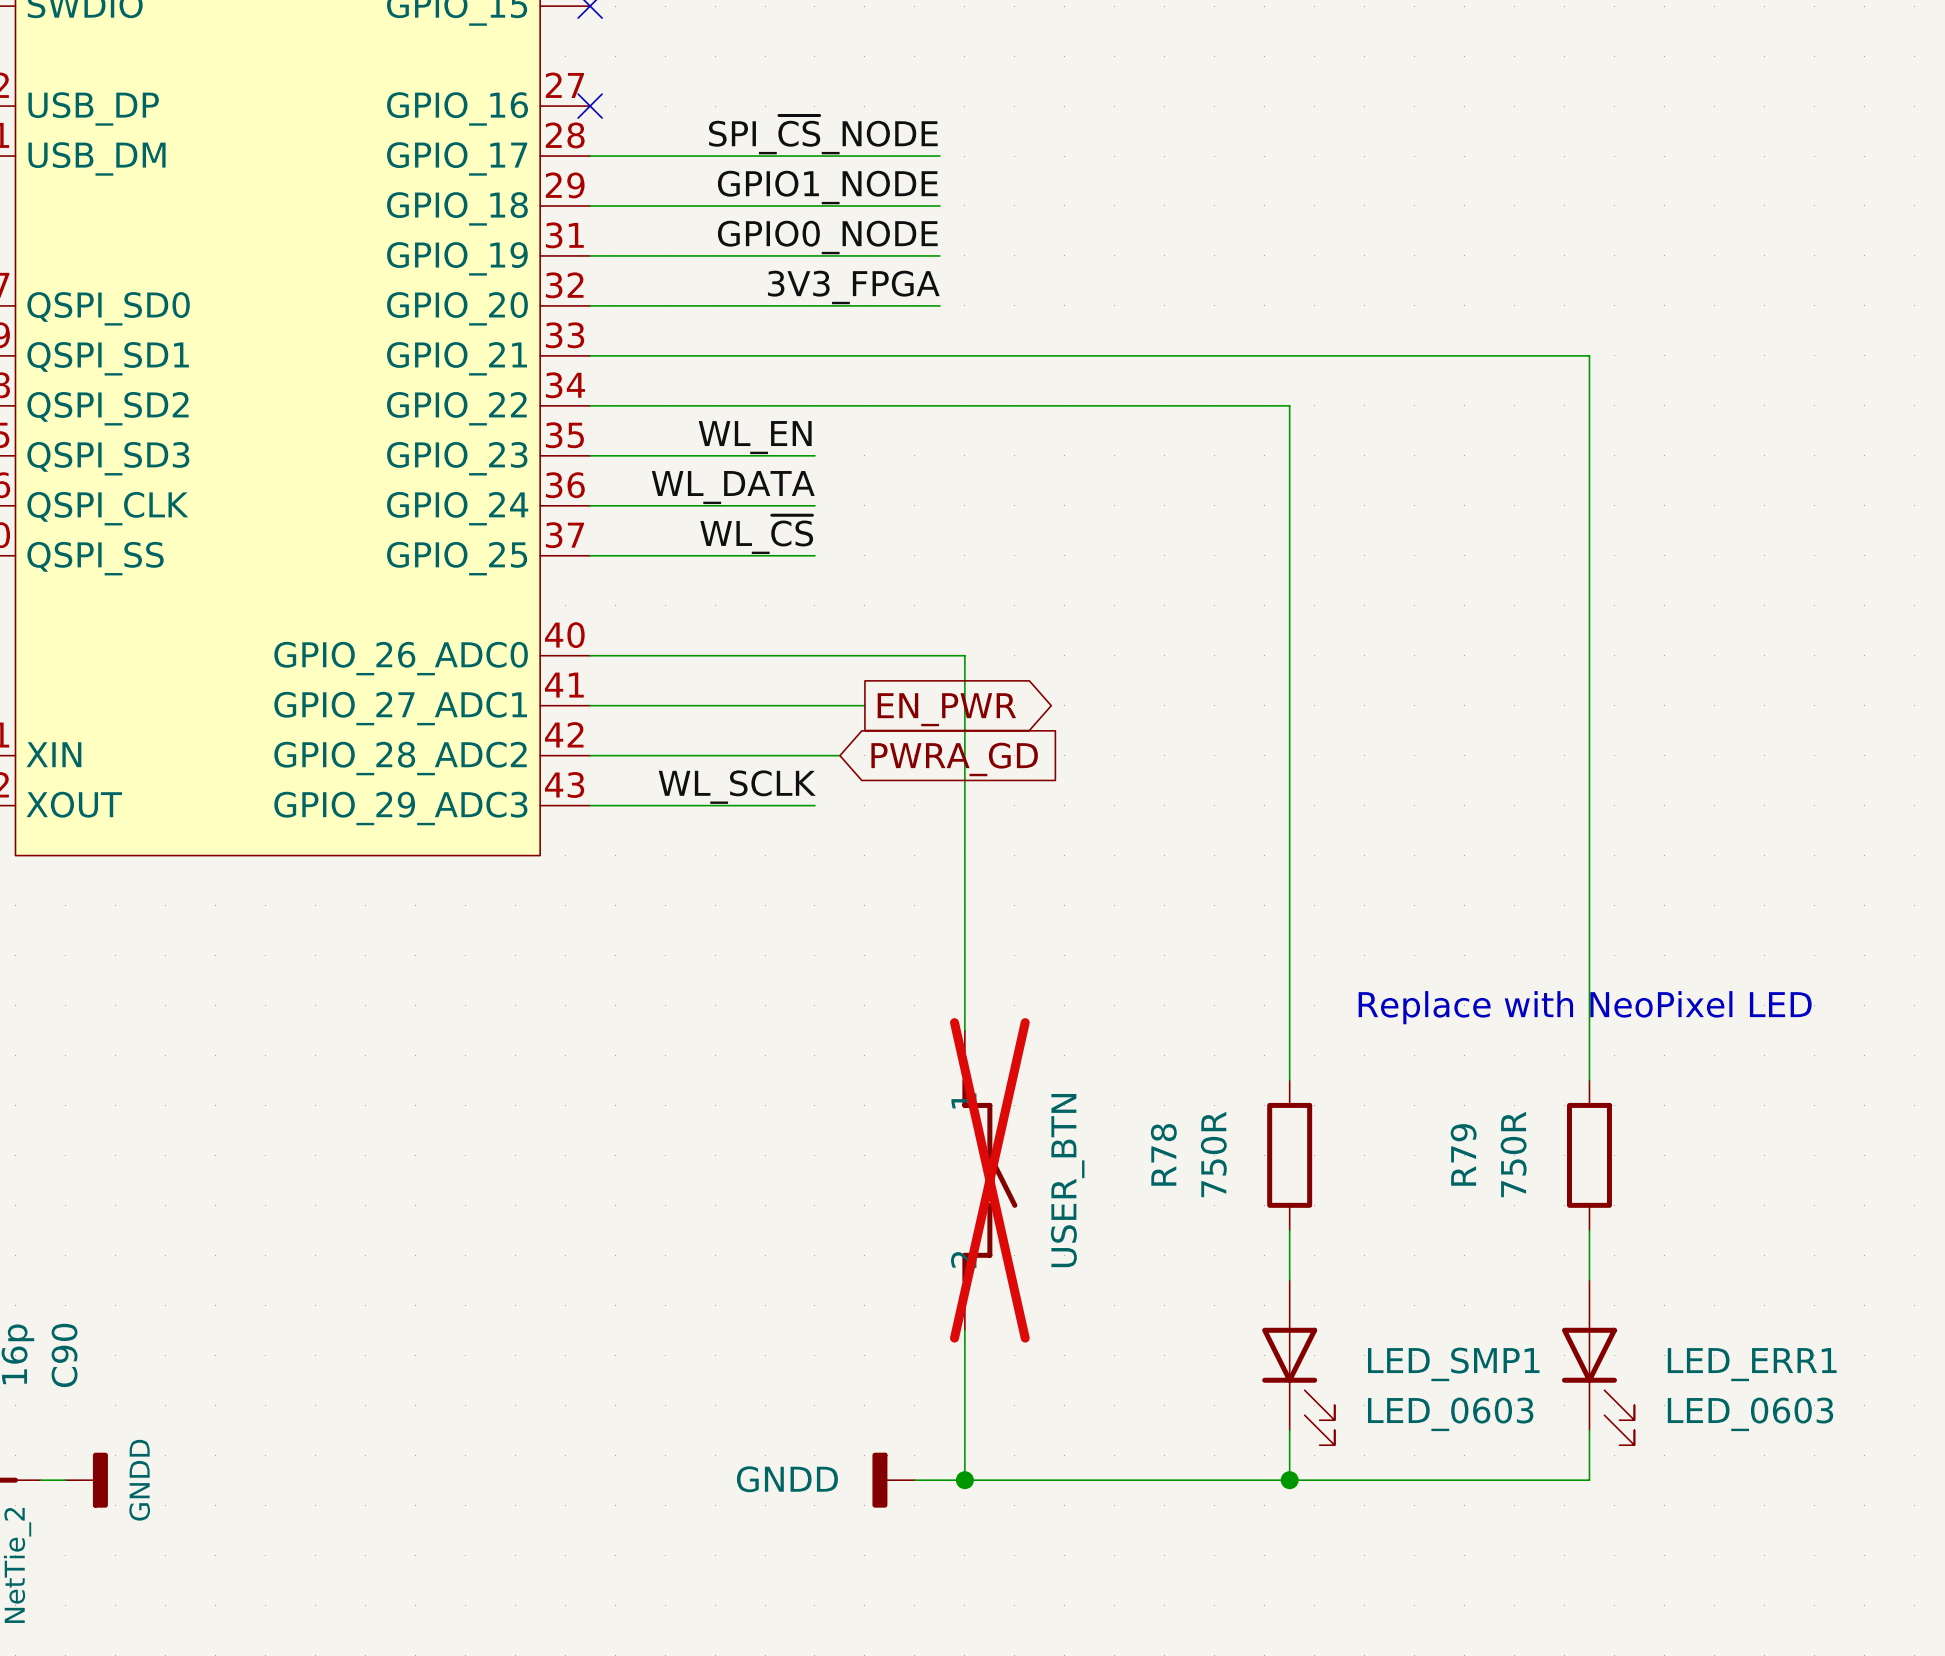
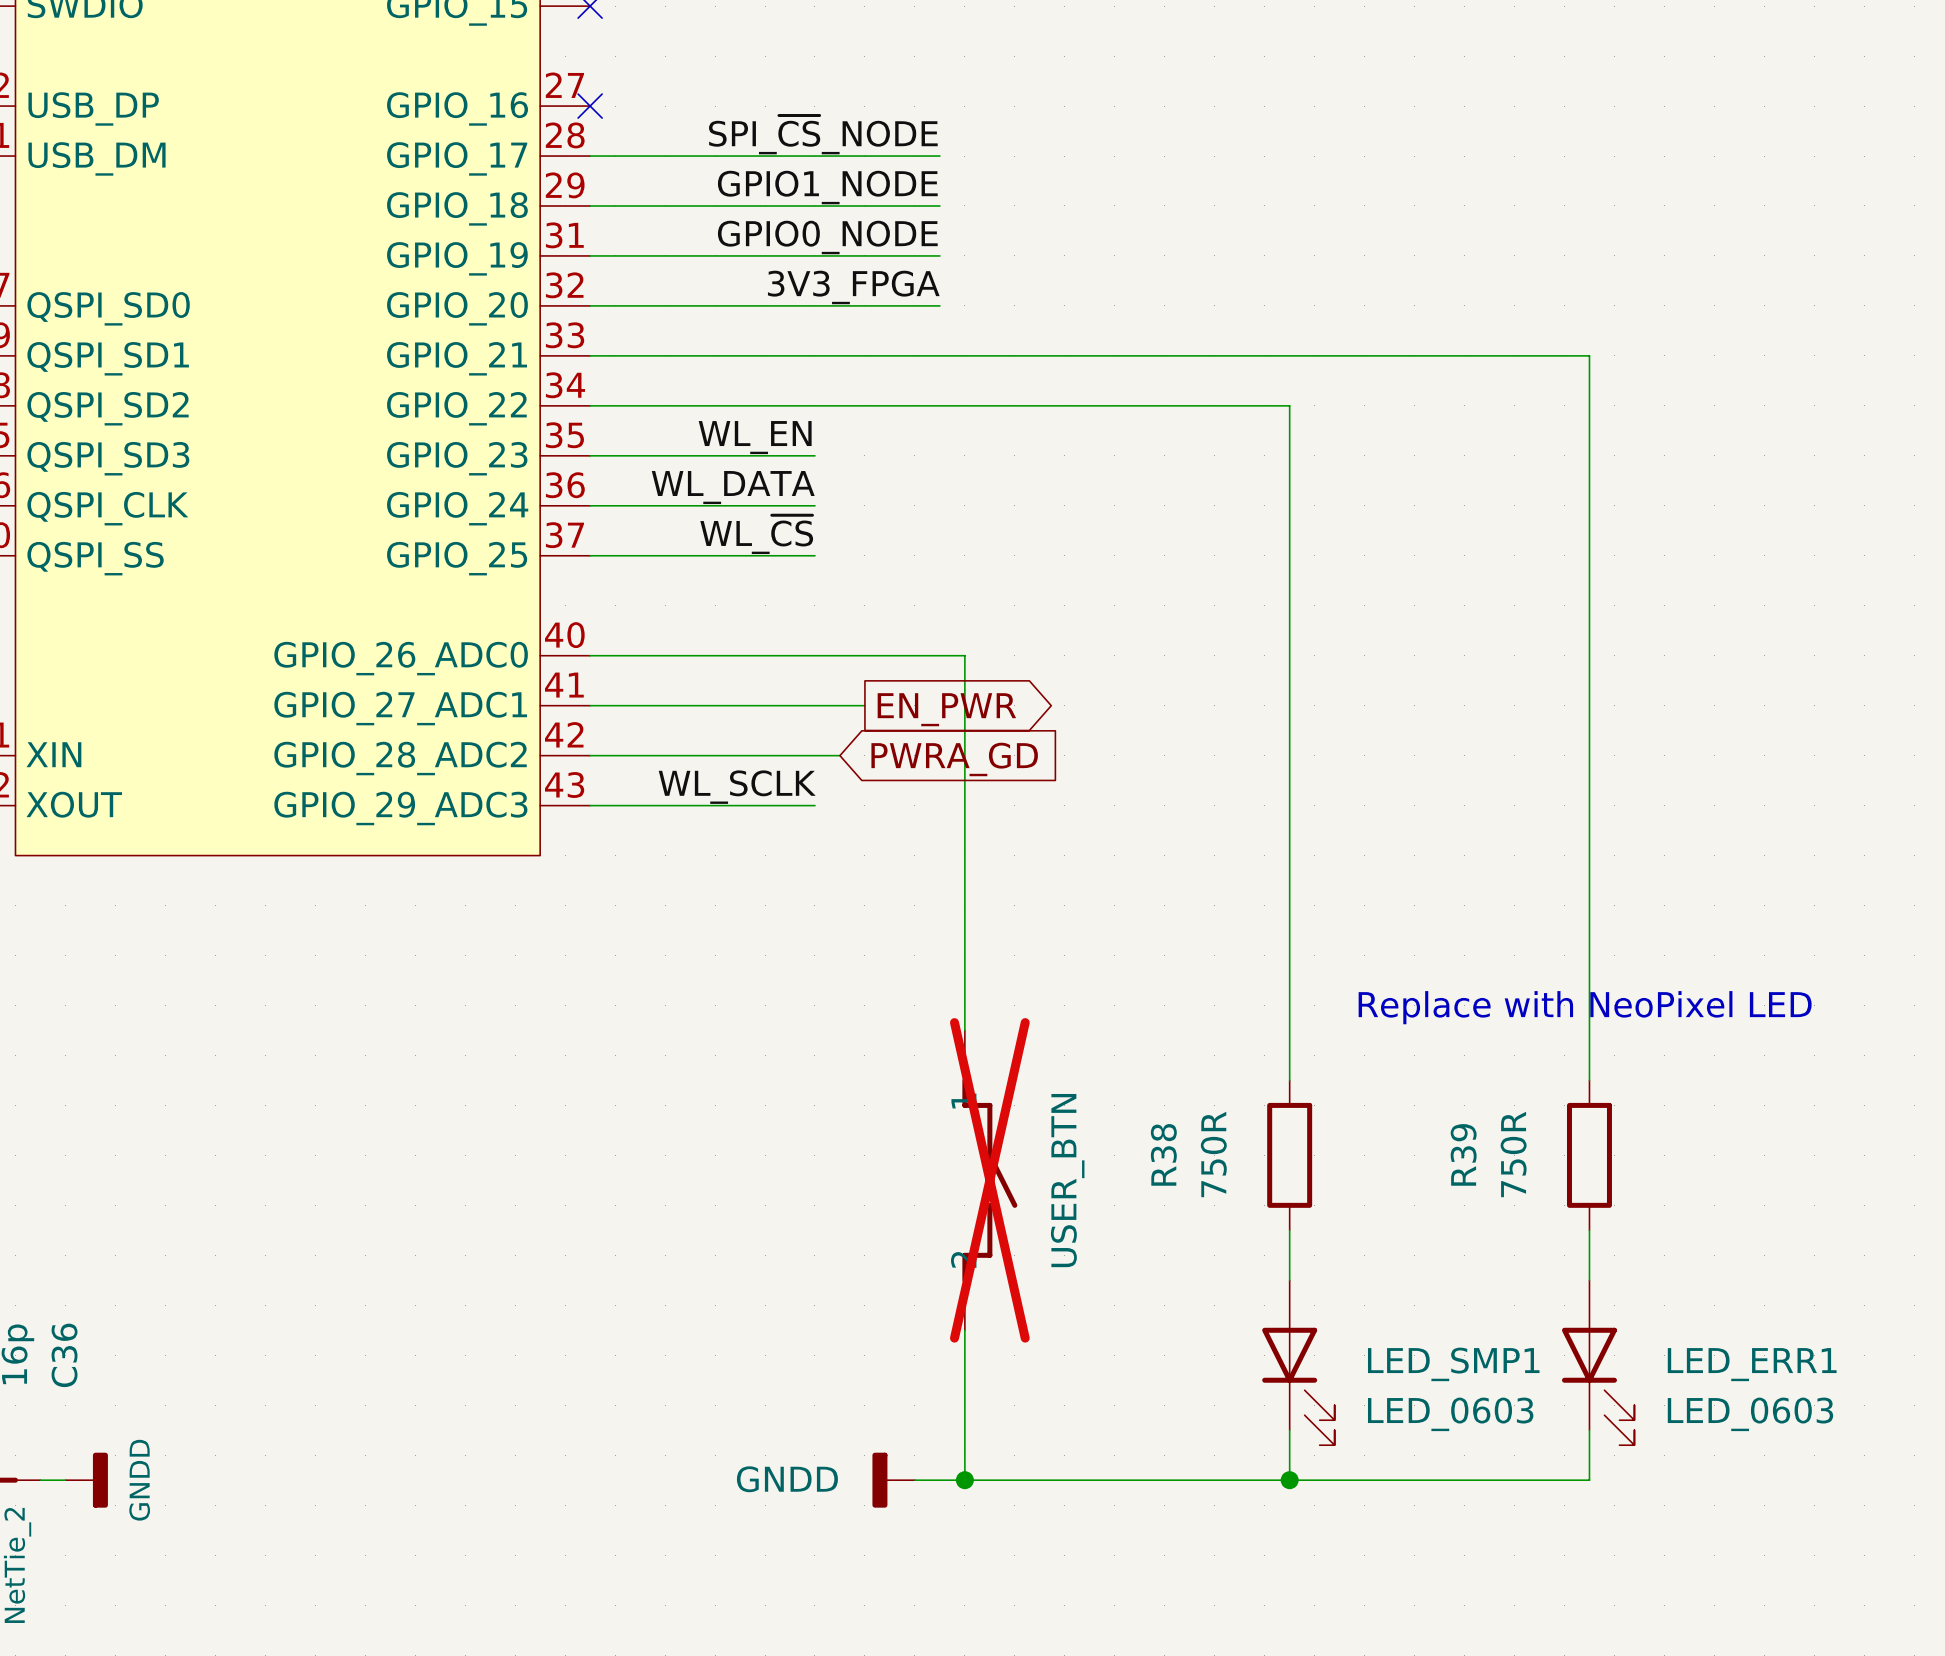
R78 name: R78 (1163, 1154) -> R38 (1163, 1154)
R79 name: R79 (1463, 1154) -> R39 (1463, 1154)
C90 name: C90 (64, 1355) -> C36 (64, 1355)

